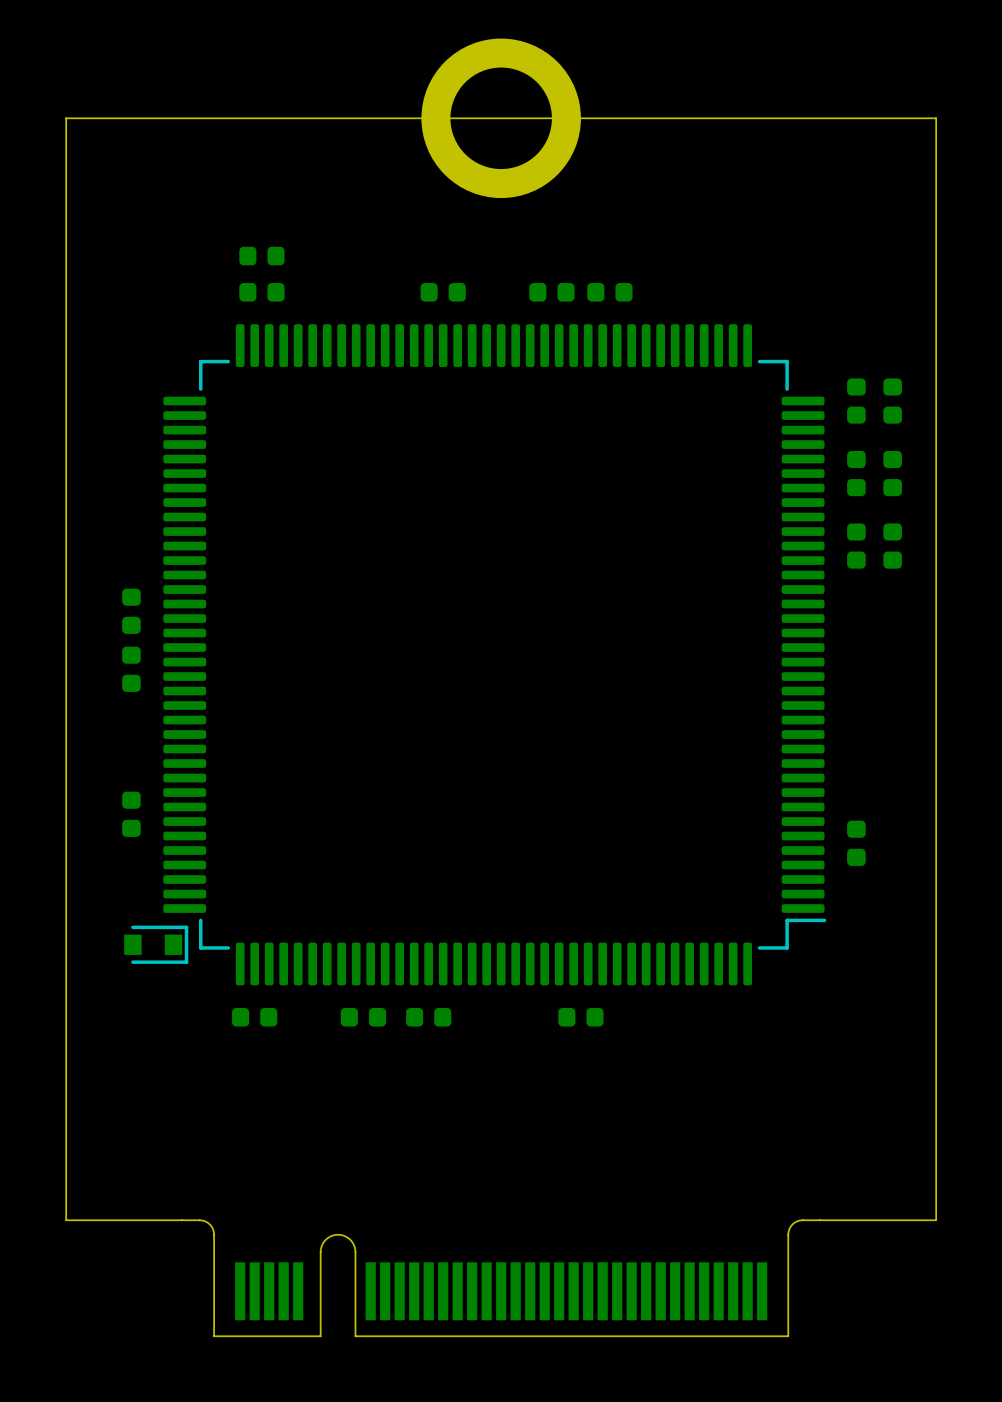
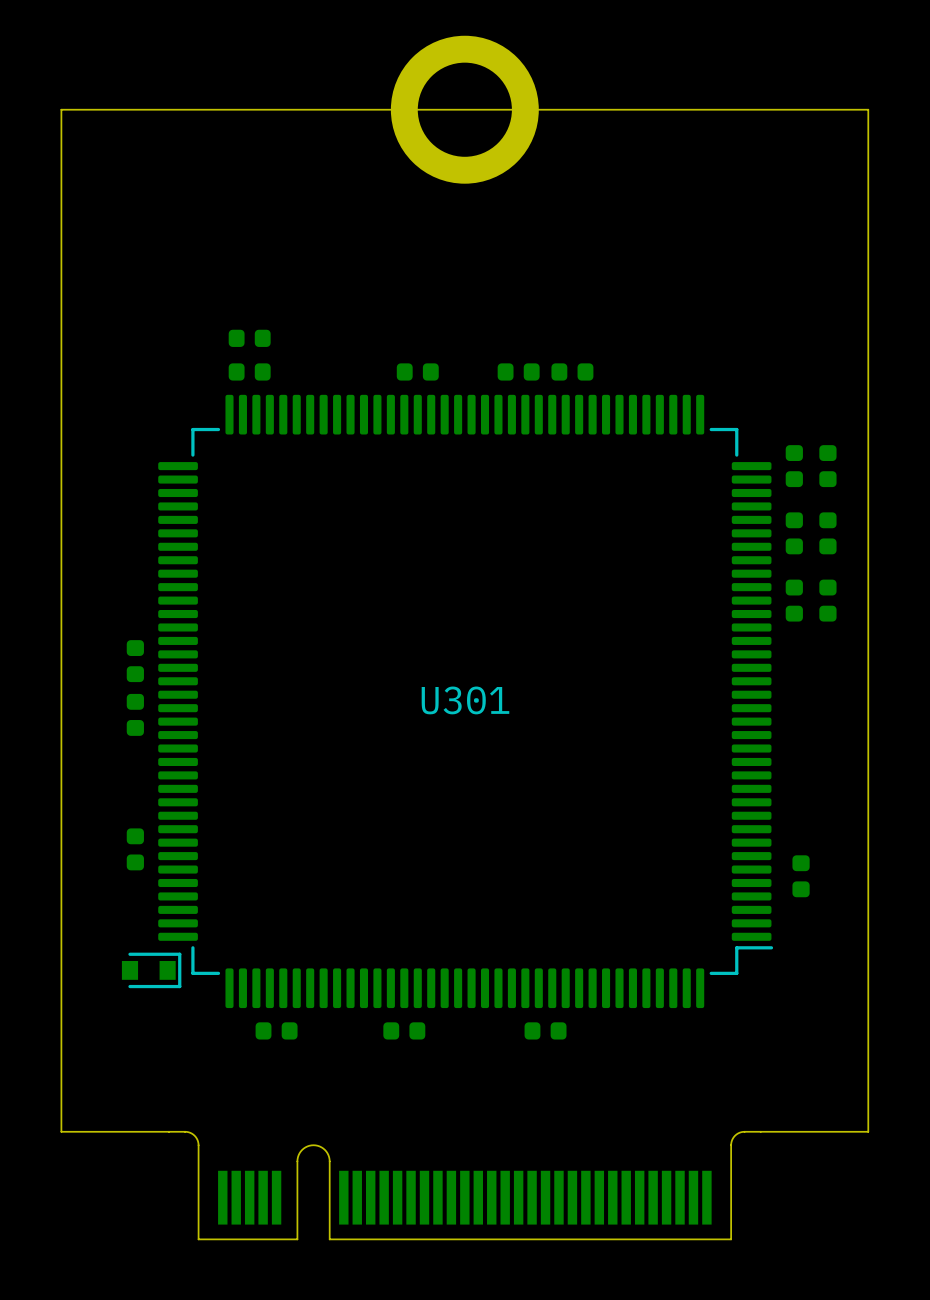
part: (261, 256) -> none
part: (261, 292) -> none
part: (443, 292) -> none
part: (551, 292) -> none
part: (609, 292) -> none
part: none -> (249, 338)
part: none -> (249, 371)
part: none -> (417, 371)
part: none -> (518, 371)
part: none -> (572, 371)
part: (856, 401) -> none
part: (892, 401) -> none
part: (856, 473) -> none
part: (892, 473) -> none
part: none -> (794, 466)
part: none -> (827, 466)
part: (856, 546) -> none
part: (892, 546) -> none
part: none -> (794, 533)
part: none -> (827, 533)
part: (131, 611) -> none
part: none -> (794, 600)
part: none -> (827, 600)
part: (494, 654) -> none
part position: (131, 669) -> (135, 661)
U301: none -> (465, 701)
part position: (131, 814) -> (135, 714)
part: (856, 843) -> none
part: none -> (135, 849)
part position: (156, 944) -> (151, 970)
part: none -> (801, 876)
part: (254, 1017) -> none
part: (363, 1017) -> none
part: (428, 1017) -> none
part: (580, 1017) -> none
part: none -> (276, 1030)
part: none -> (404, 1030)
part: none -> (545, 1030)

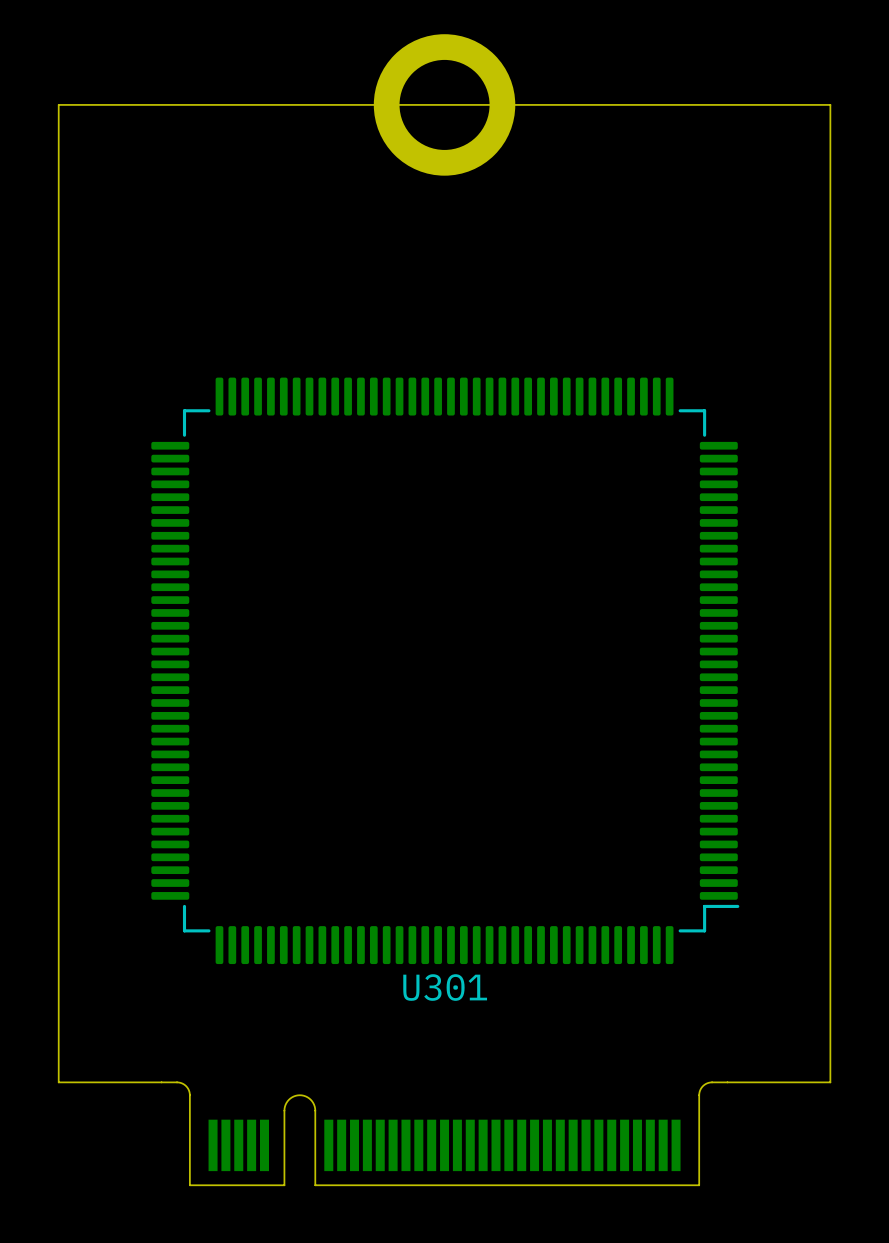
part: (249, 338) -> none
part: (249, 371) -> none
part: (417, 371) -> none
part: (518, 371) -> none
part: (572, 371) -> none
part: (794, 466) -> none
part: (827, 466) -> none
part: (794, 533) -> none
part: (827, 533) -> none
part: (794, 600) -> none
part: (827, 600) -> none
part: (135, 661) -> none
U301 name position: U301 (465, 700) -> U301 (445, 987)
part: (135, 714) -> none
part: (135, 849) -> none
part: (801, 876) -> none
part: (151, 970) -> none
part: (276, 1030) -> none
part: (404, 1030) -> none
part: (545, 1030) -> none

